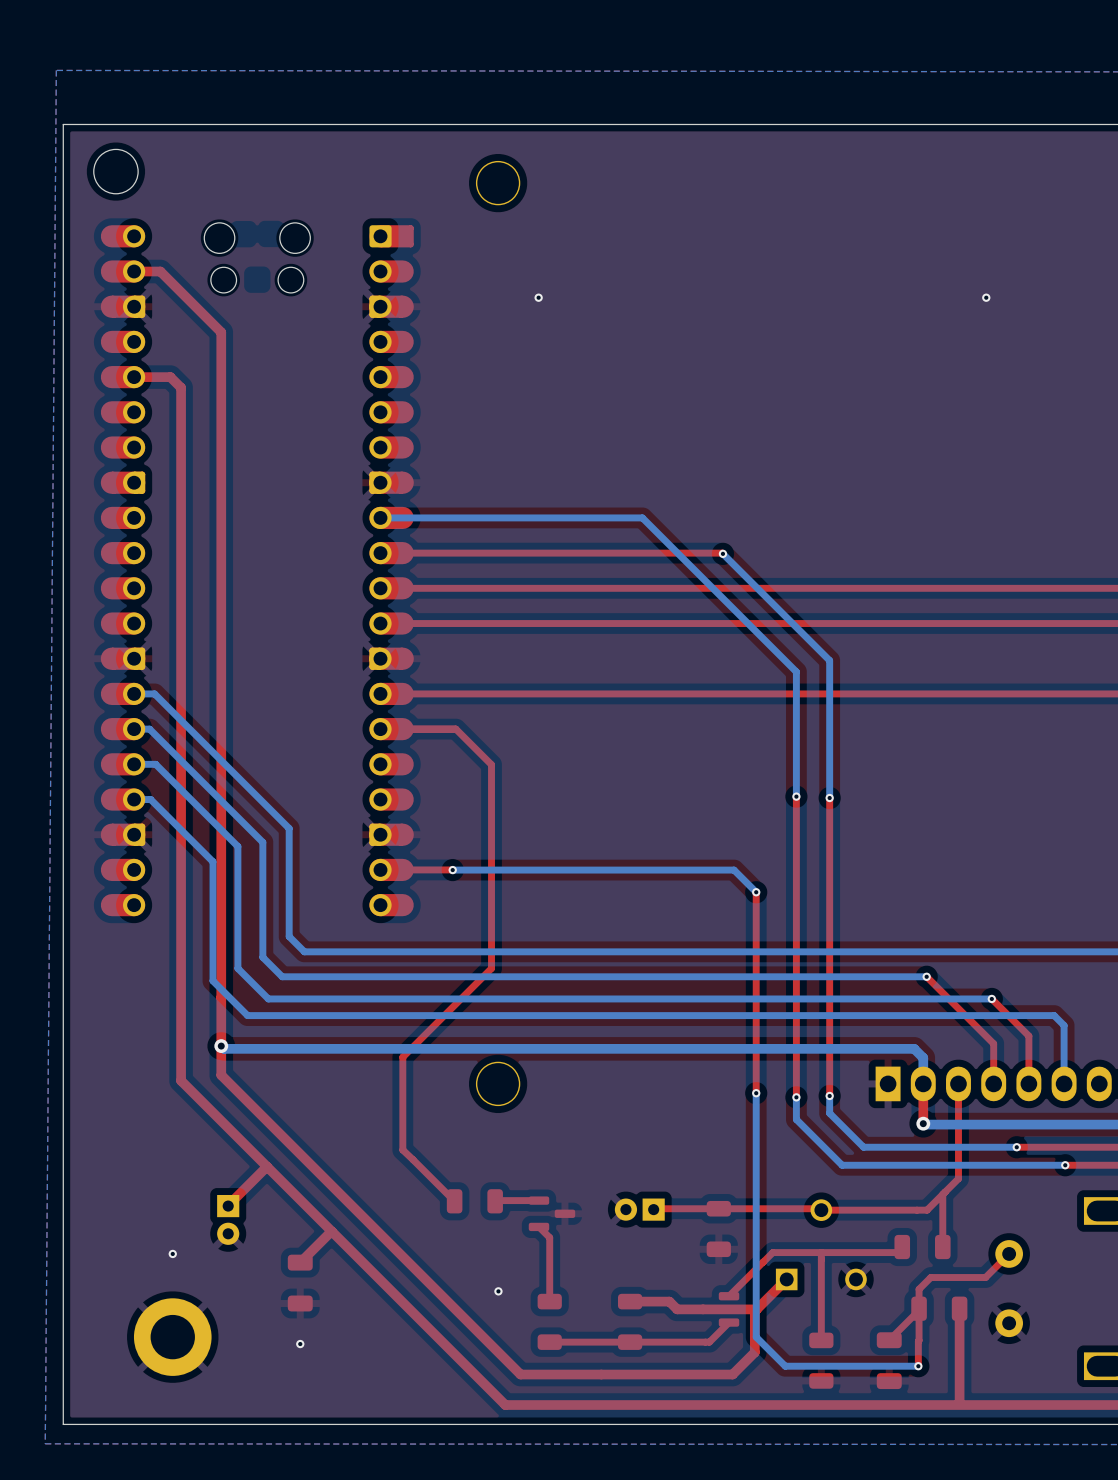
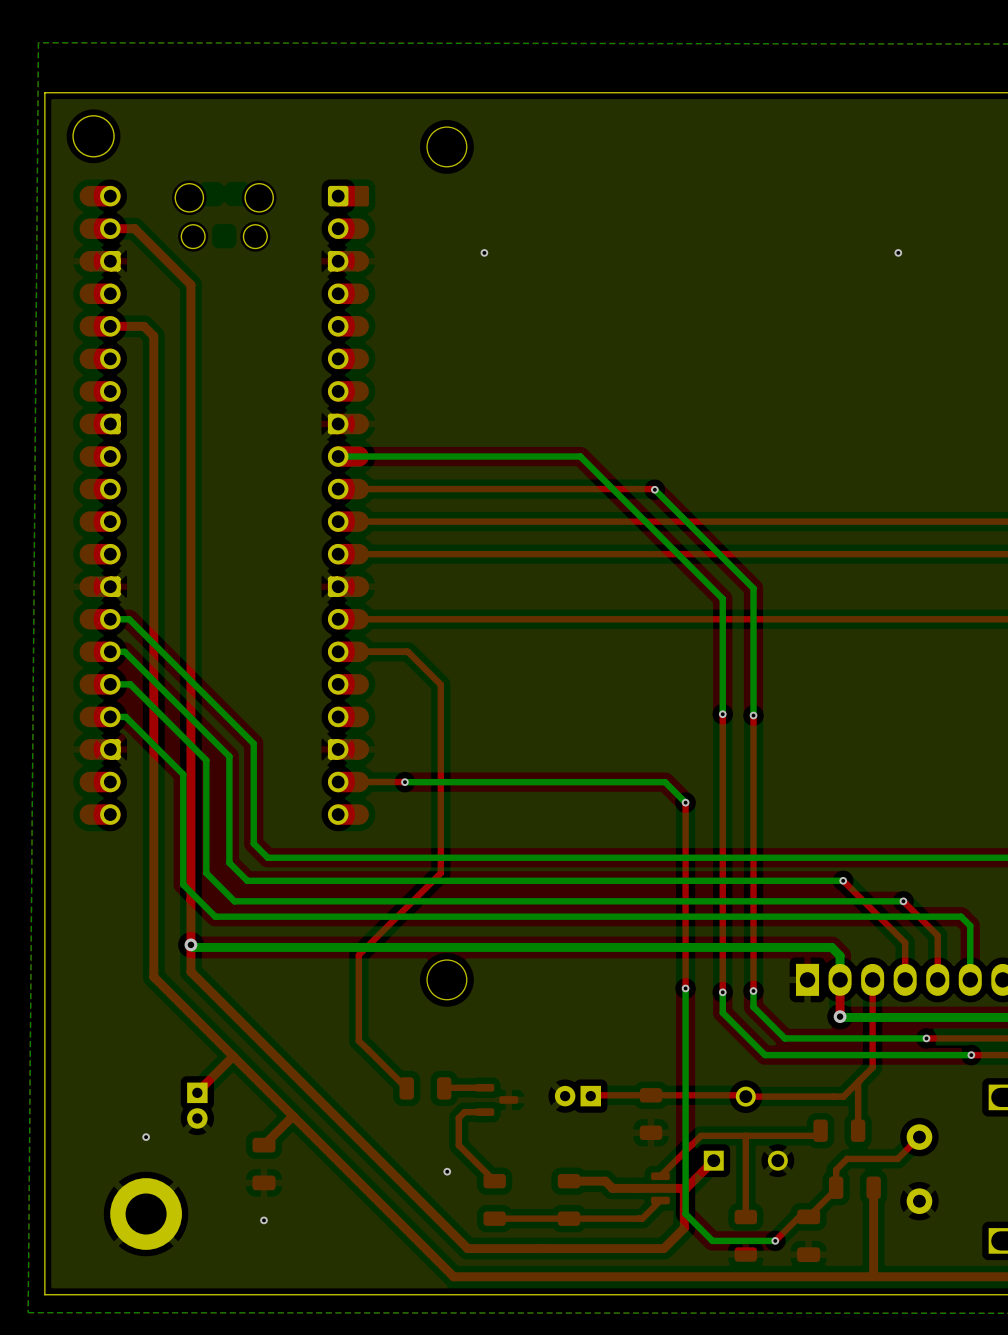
top track: (538, 1226) (549, 1237) (549, 1301) -> (484, 1112) (464, 1112) (458, 1117) (458, 1145) (494, 1181)
top track: (919, 1310) (918, 1366) -> none
top track: none -> (798, 1217) (775, 1240)
bottom track: (918, 1366) (853, 1366) -> none
via position: (918, 1366) -> (775, 1240)

